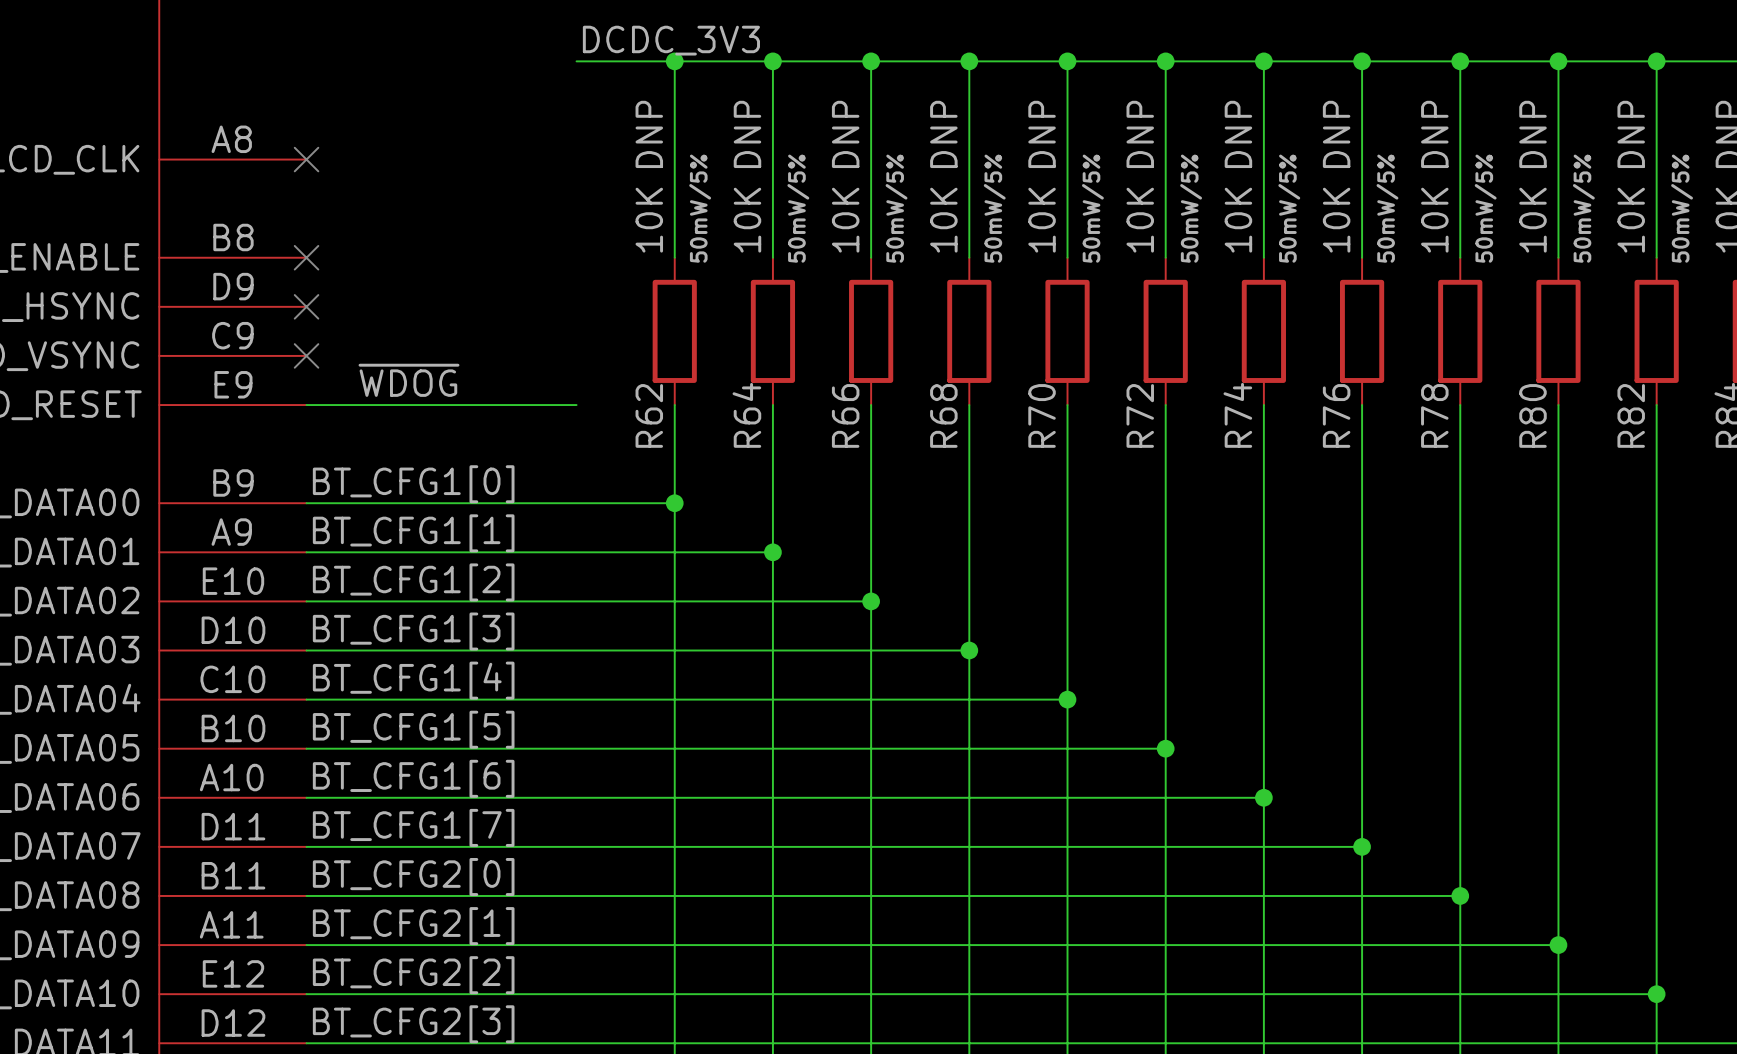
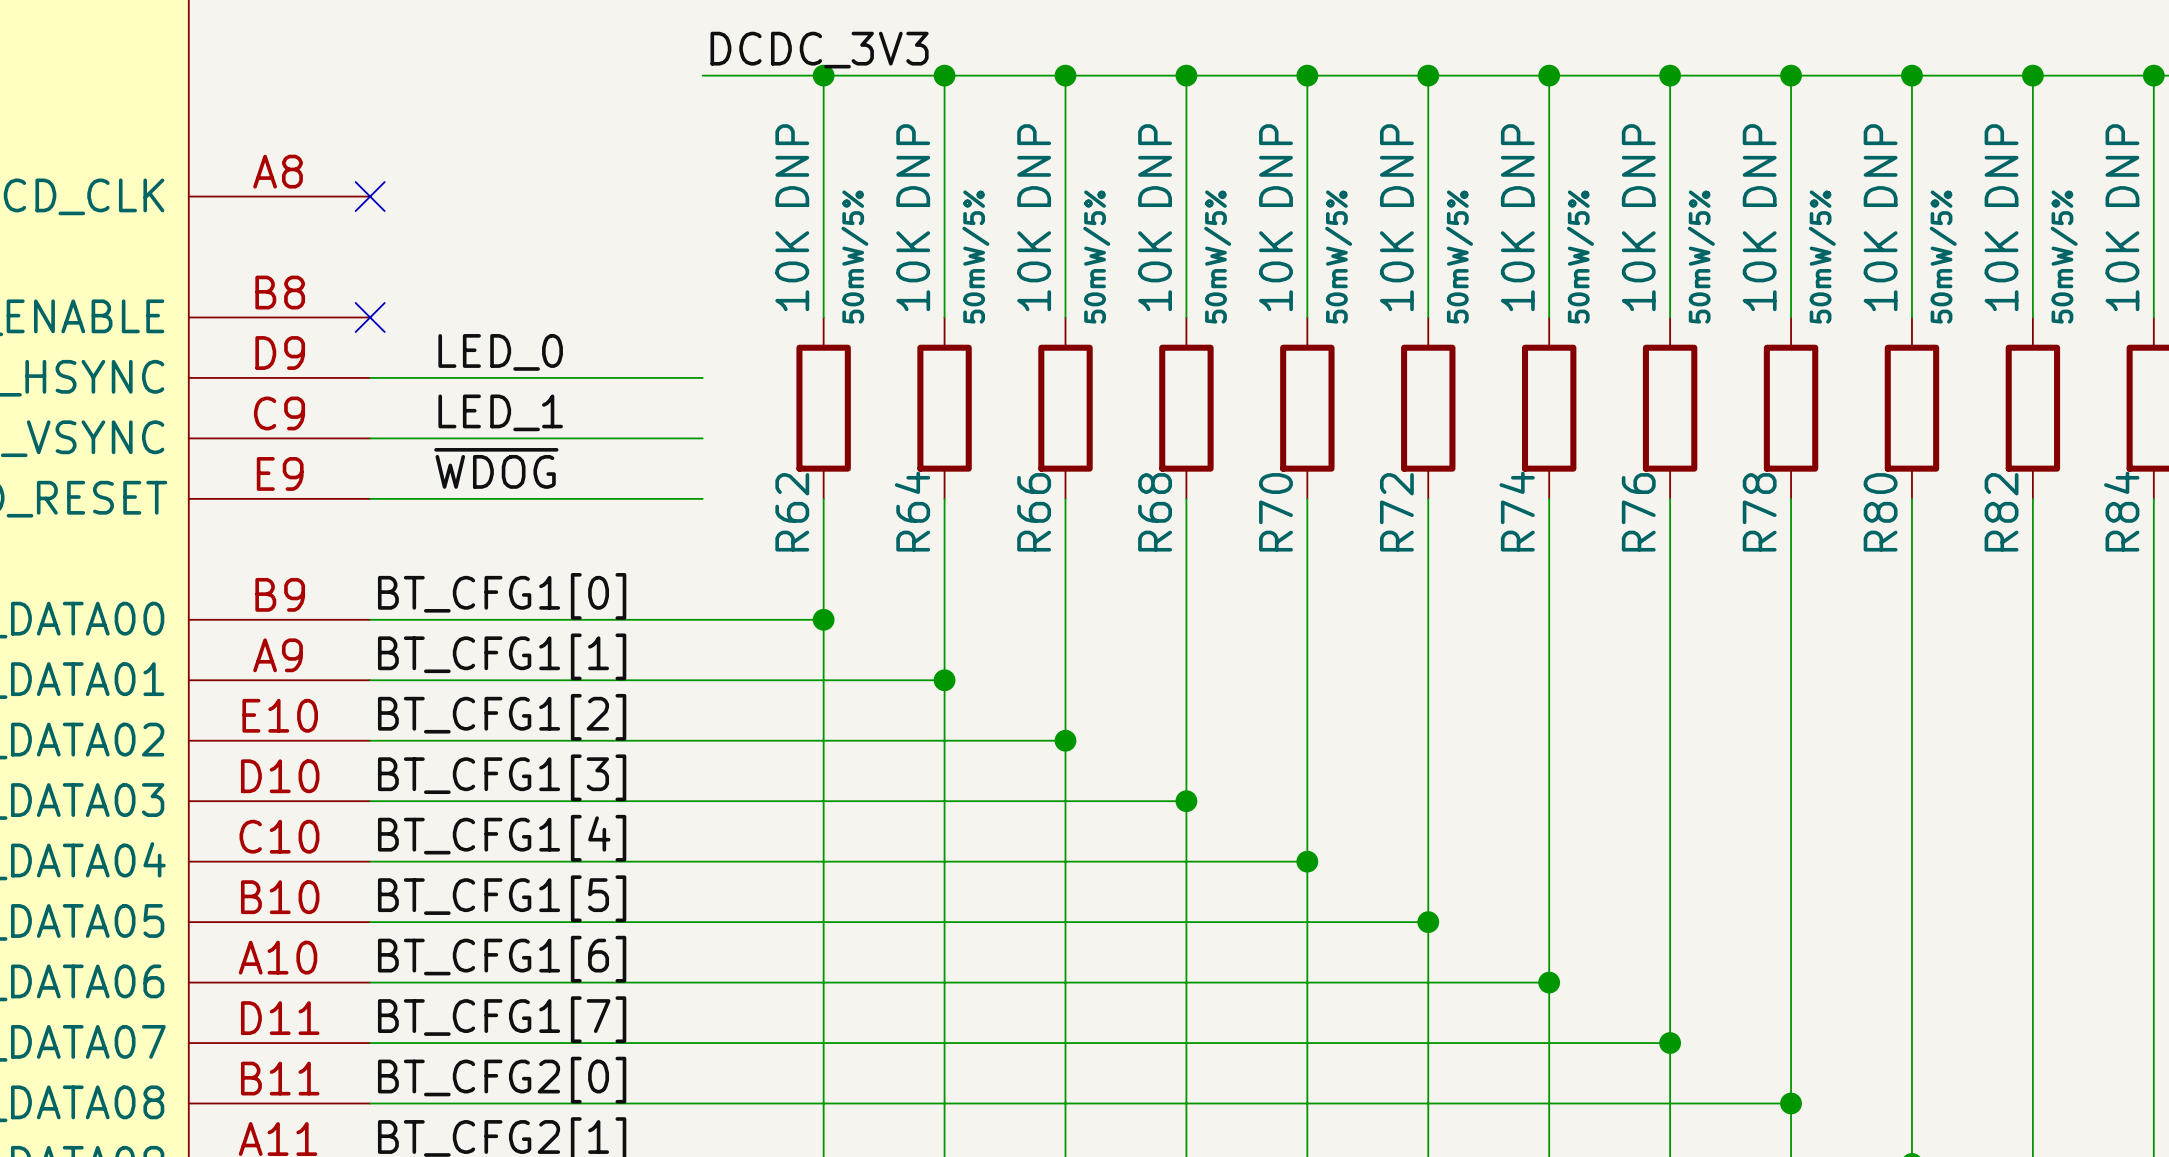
label: none -> LED_0 (500, 352)
wire: none -> (370, 377) (702, 377)
no-connect mark: (306, 306) -> none
label: none -> LED_1 (500, 412)
wire: none -> (370, 438) (702, 438)
no-connect mark: (306, 355) -> none

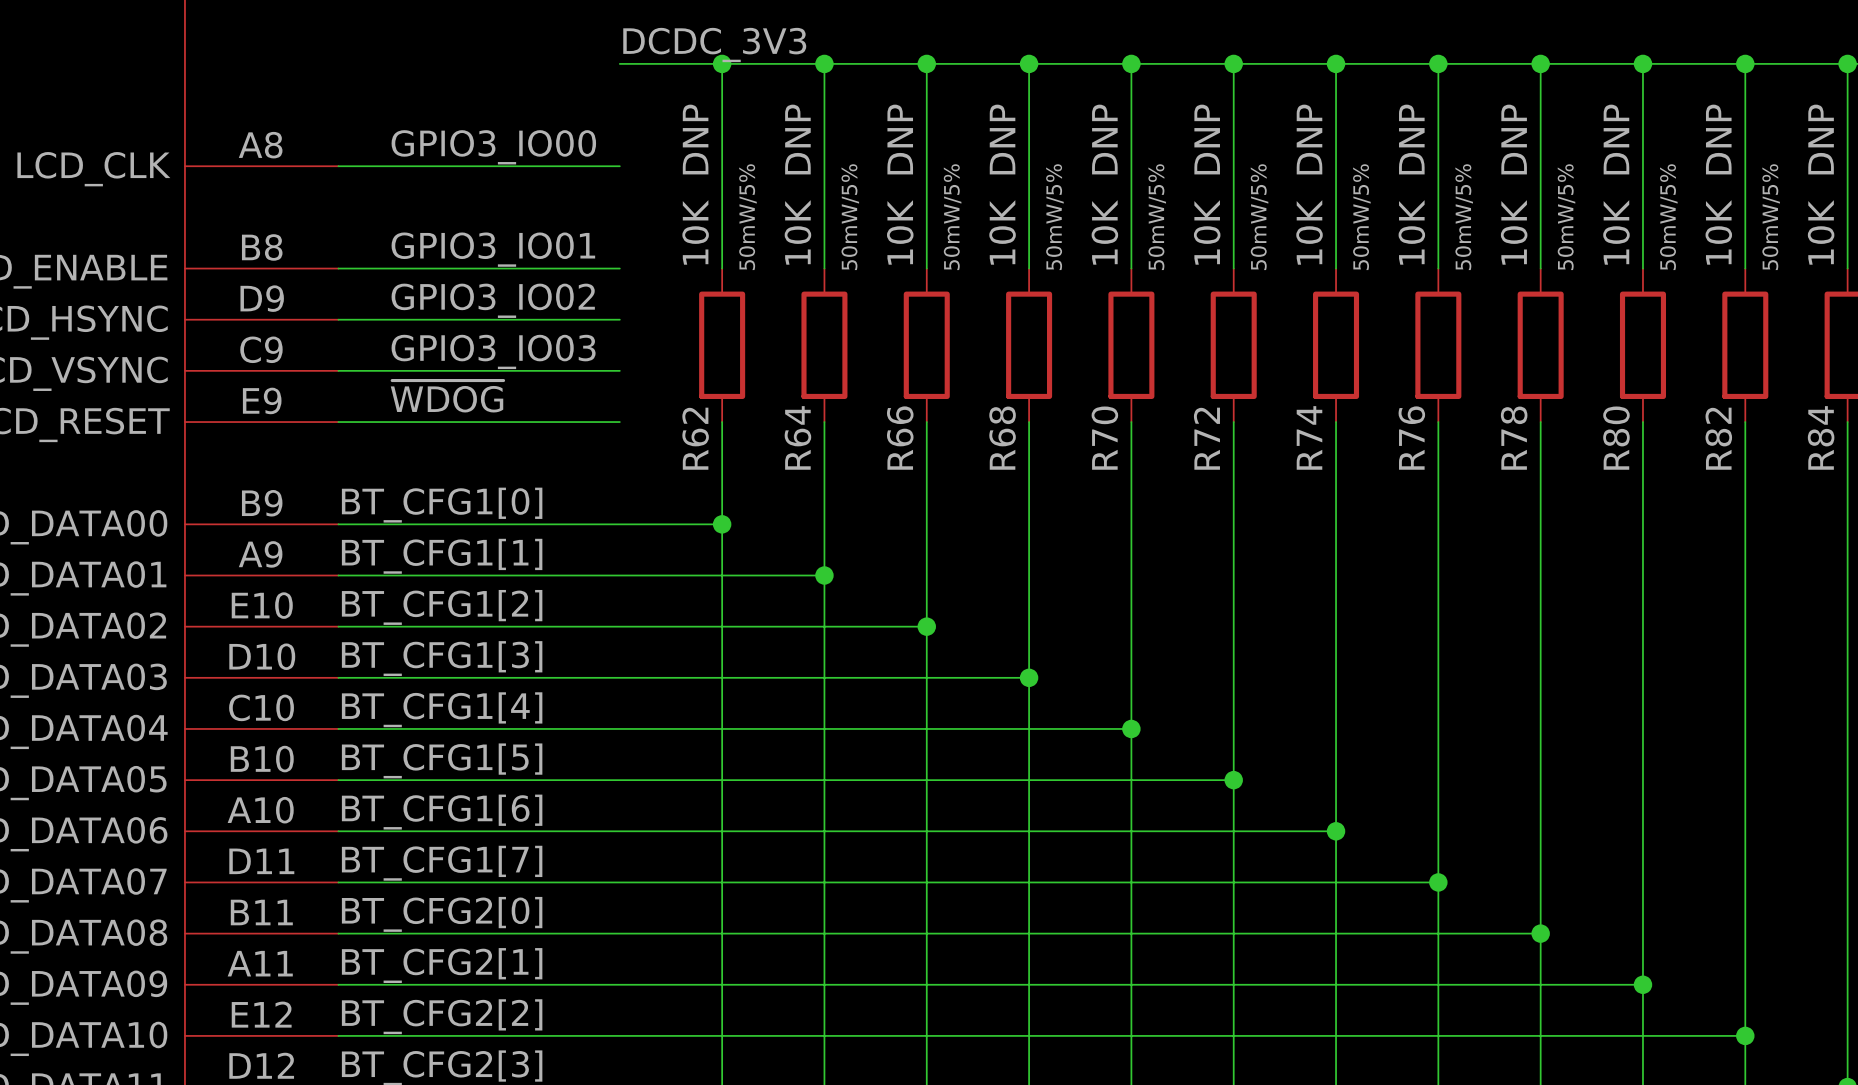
label: none -> GPIO3_IO00 (493, 147)
wire: none -> (338, 166) (619, 166)
no-connect mark: (370, 196) -> none
label: none -> GPIO3_IO01 (493, 249)
wire: none -> (338, 268) (619, 268)
no-connect mark: (370, 317) -> none
label: LED_0 (500, 352) -> GPIO3_IO02 (493, 300)
label: LED_1 (500, 412) -> GPIO3_IO03 (493, 351)

